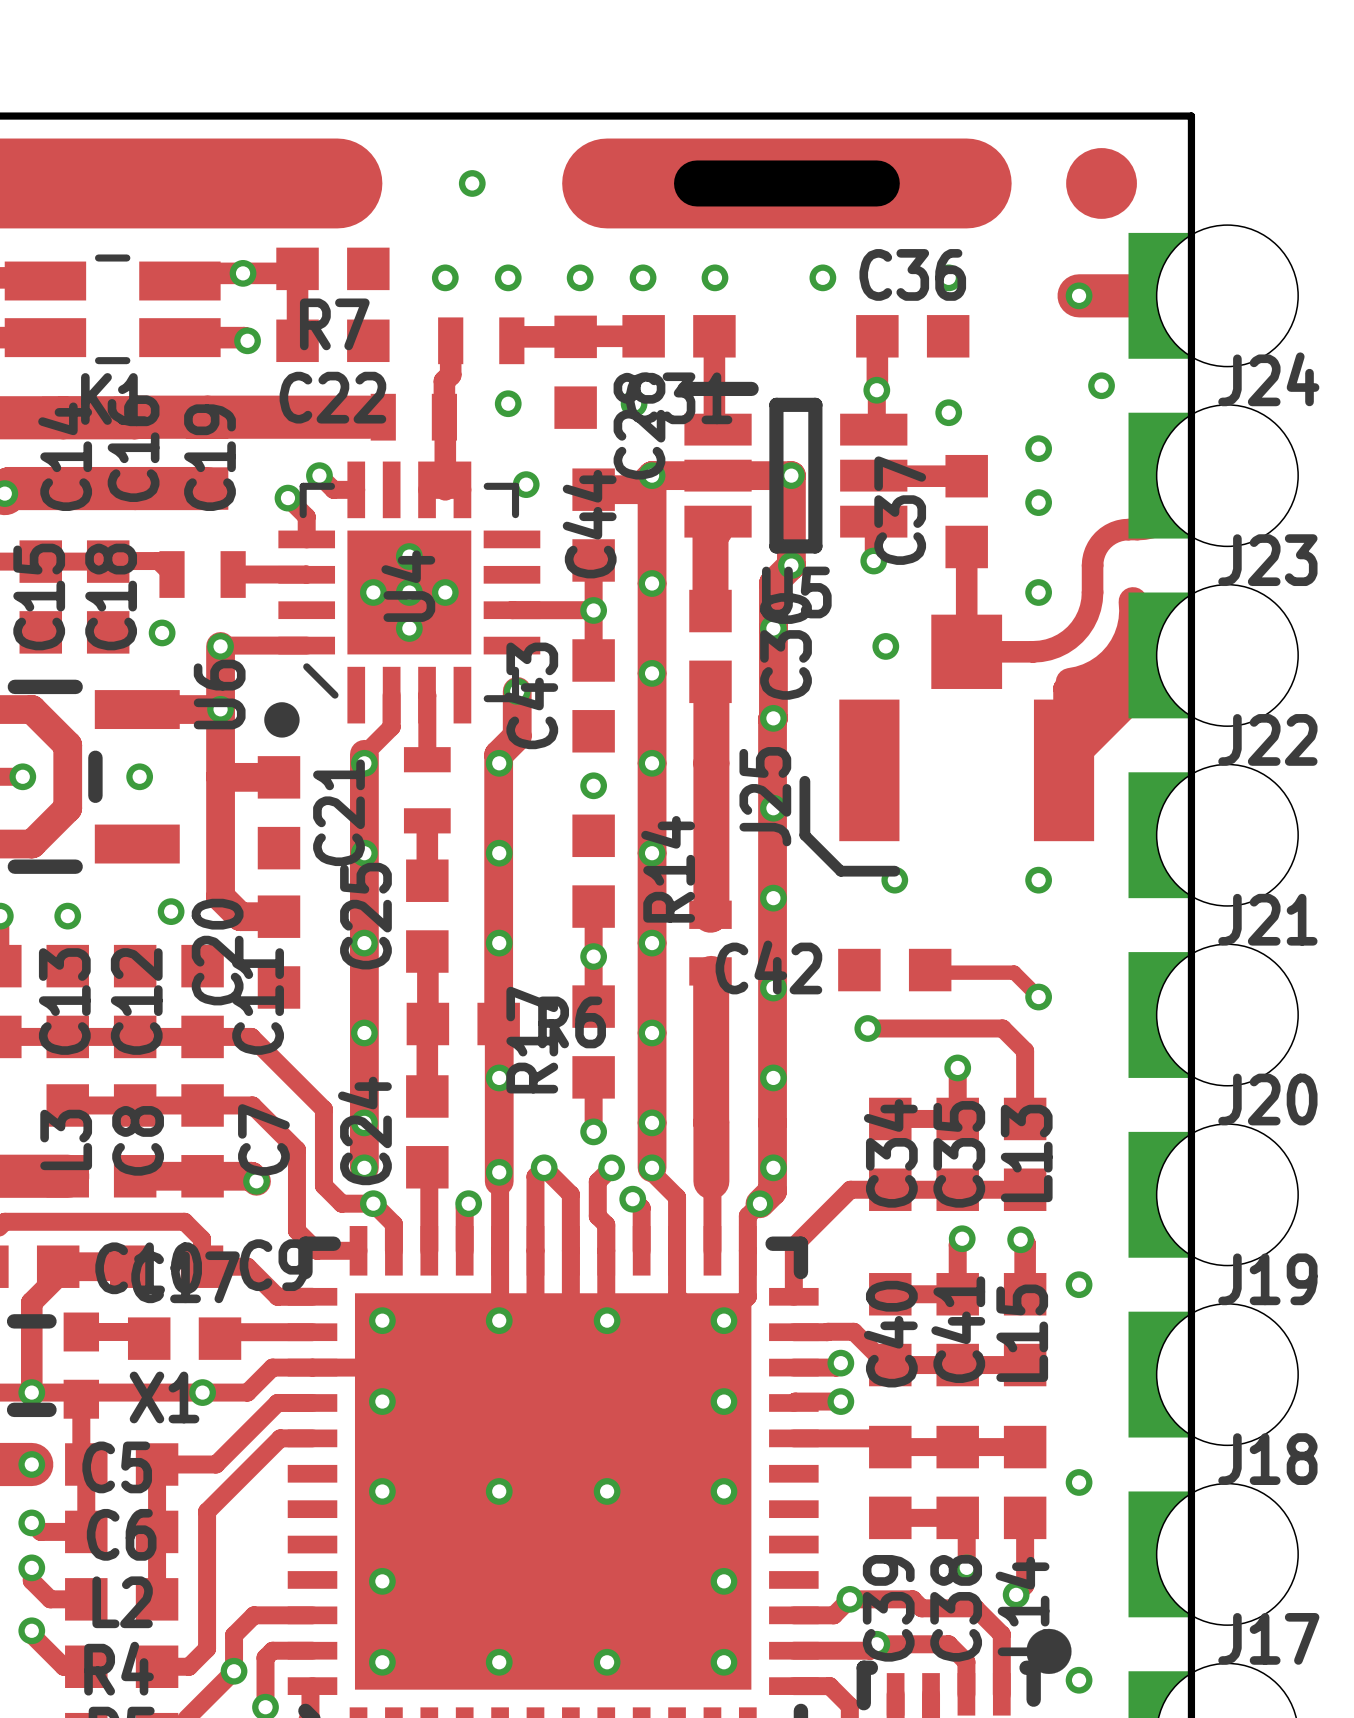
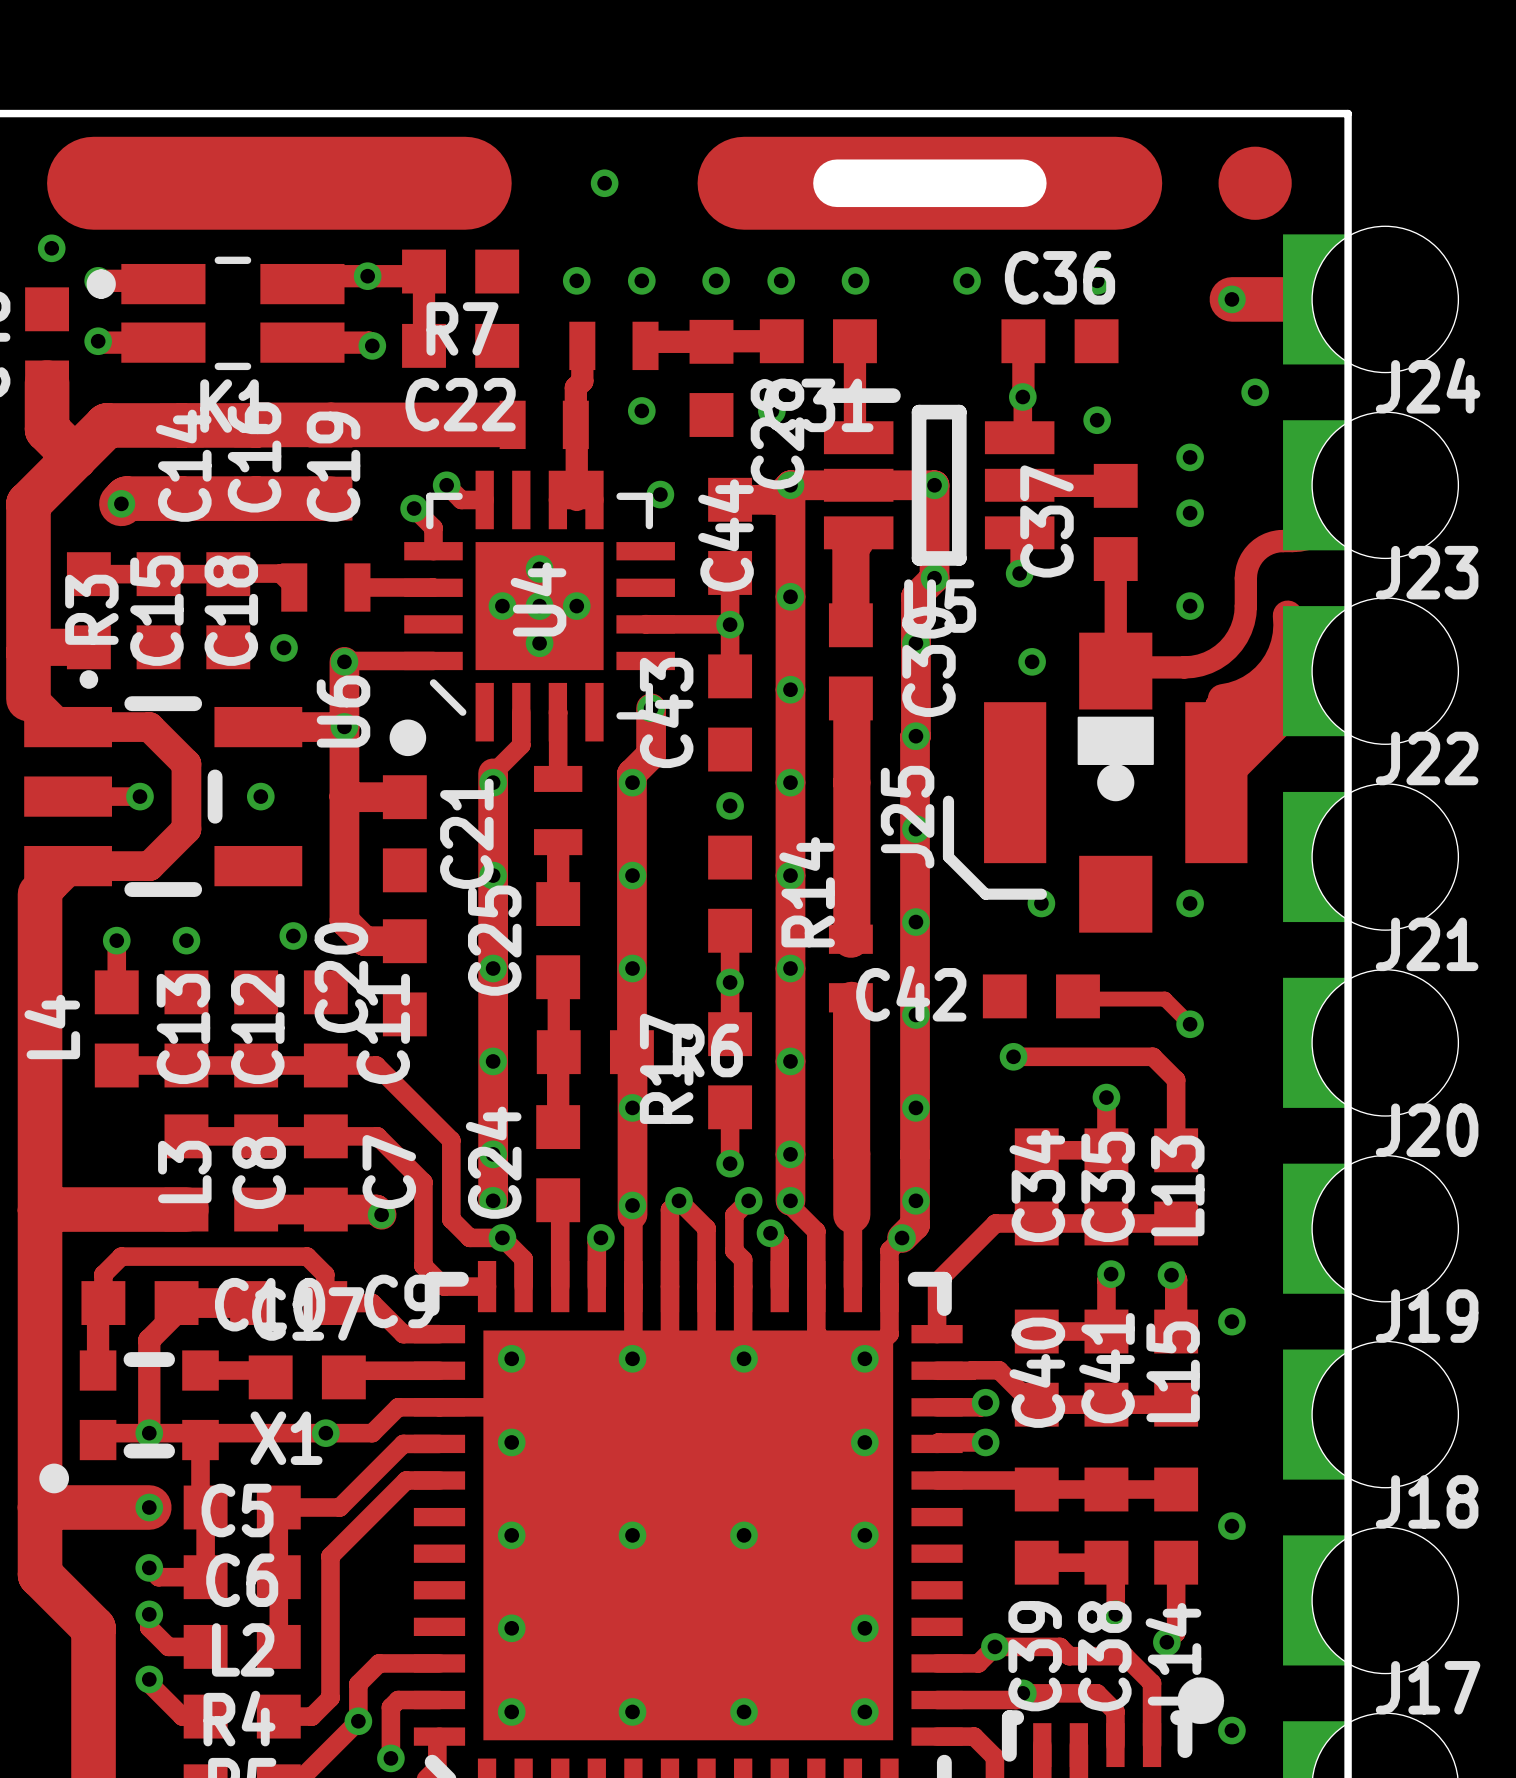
J25 footprint: [799, 614, 1095, 877] -> [942, 632, 1248, 933]

